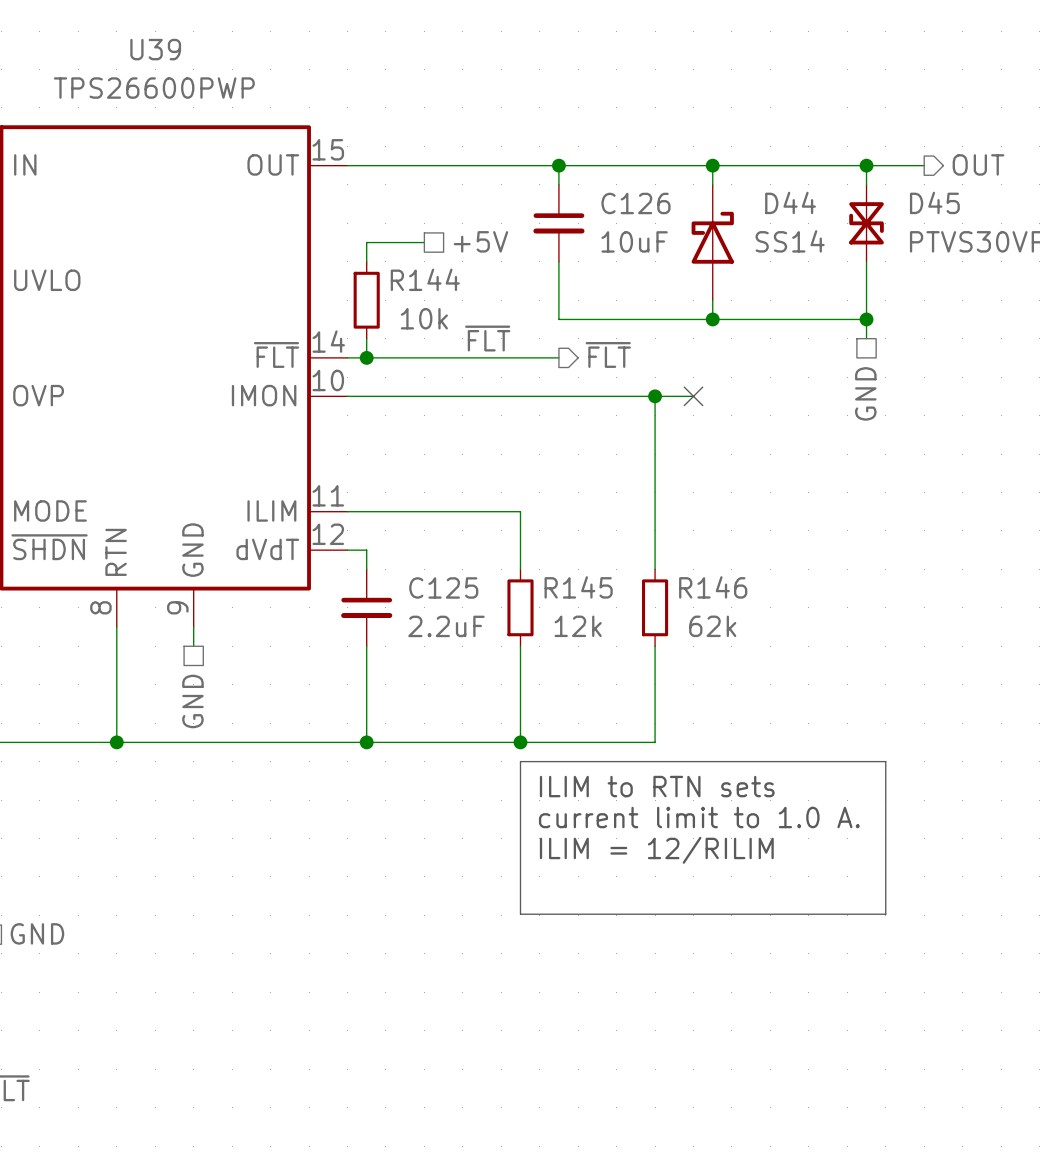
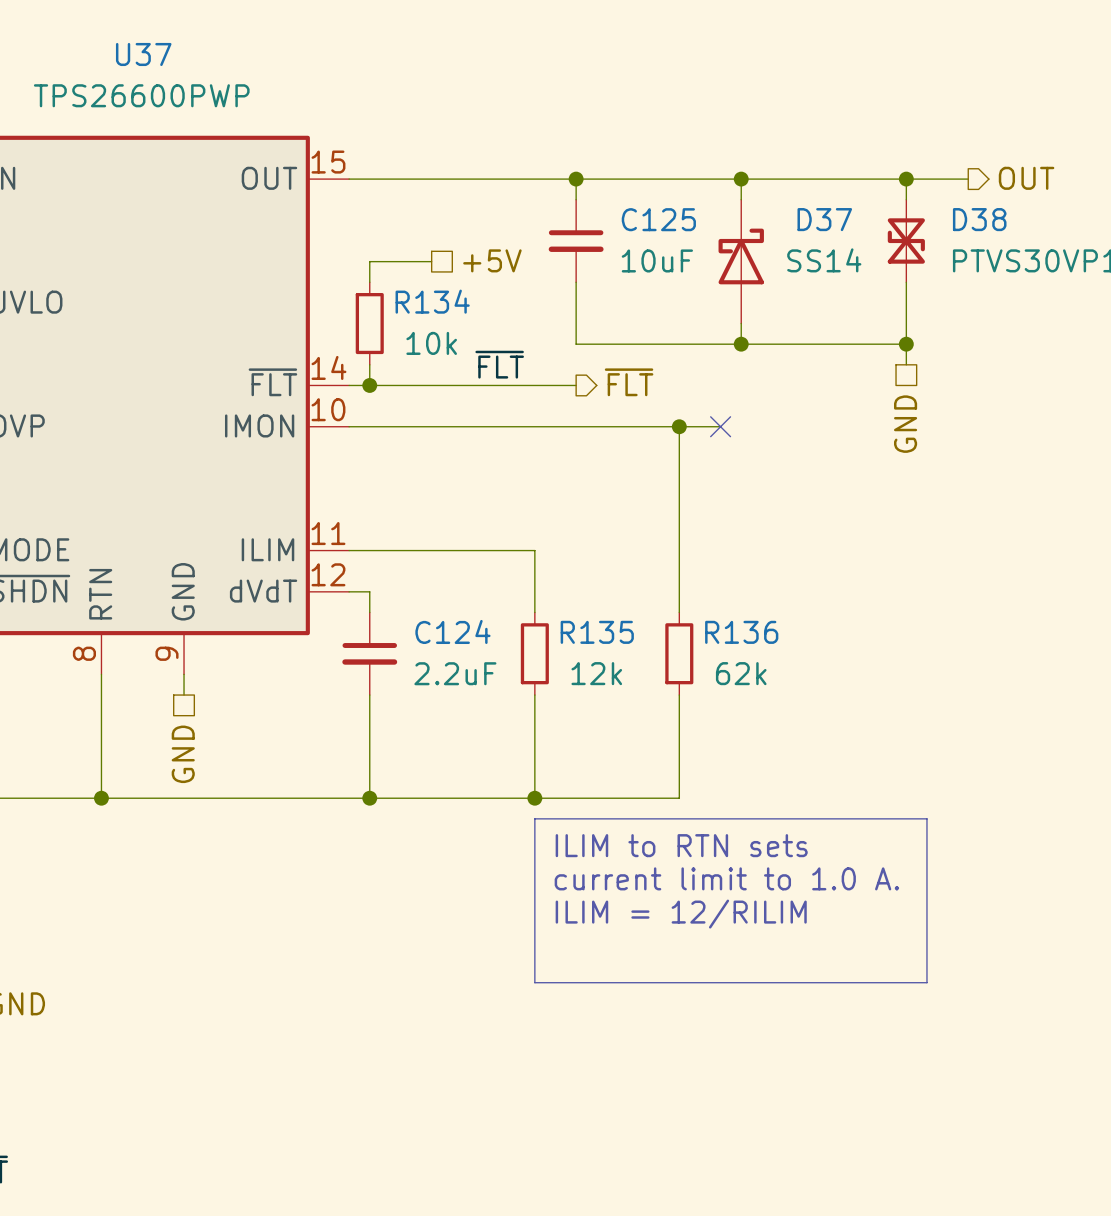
U39 name: U39 (155, 49) -> U37 (143, 54)
D44 name: D44 (790, 202) -> D37 (824, 219)
D45 name: D45 (934, 202) -> D38 (979, 219)
C126 name: C126 (635, 203) -> C125 (658, 219)
R144 name: R144 (425, 279) -> R134 (432, 301)
C125 name: C125 (443, 587) -> C124 (452, 631)
R145 name: R145 (578, 587) -> R135 (597, 632)
R146 name: R146 (713, 587) -> R136 (741, 632)

